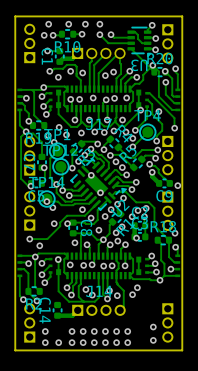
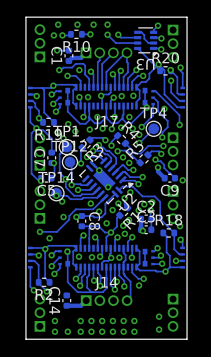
track: none -> (90, 71) (93, 74) (93, 87)
track: none -> (120, 70) (119, 87)
track: none -> (112, 74) (114, 76) (114, 87)
track: none -> (67, 75) (75, 75) (80, 80) (80, 87)
track: none -> (110, 87) (108, 94) (101, 95) (102, 106)
track: none -> (83, 235) (80, 238) (80, 248)
track: none -> (110, 248) (111, 257) (102, 262) (102, 267)
track: none -> (93, 267) (94, 280)
track: none -> (97, 267) (97, 272) (100, 275) (100, 285)
track: none -> (119, 267) (119, 275) (124, 280) (124, 286)
track: none -> (132, 267) (132, 272) (138, 278) (143, 278)

